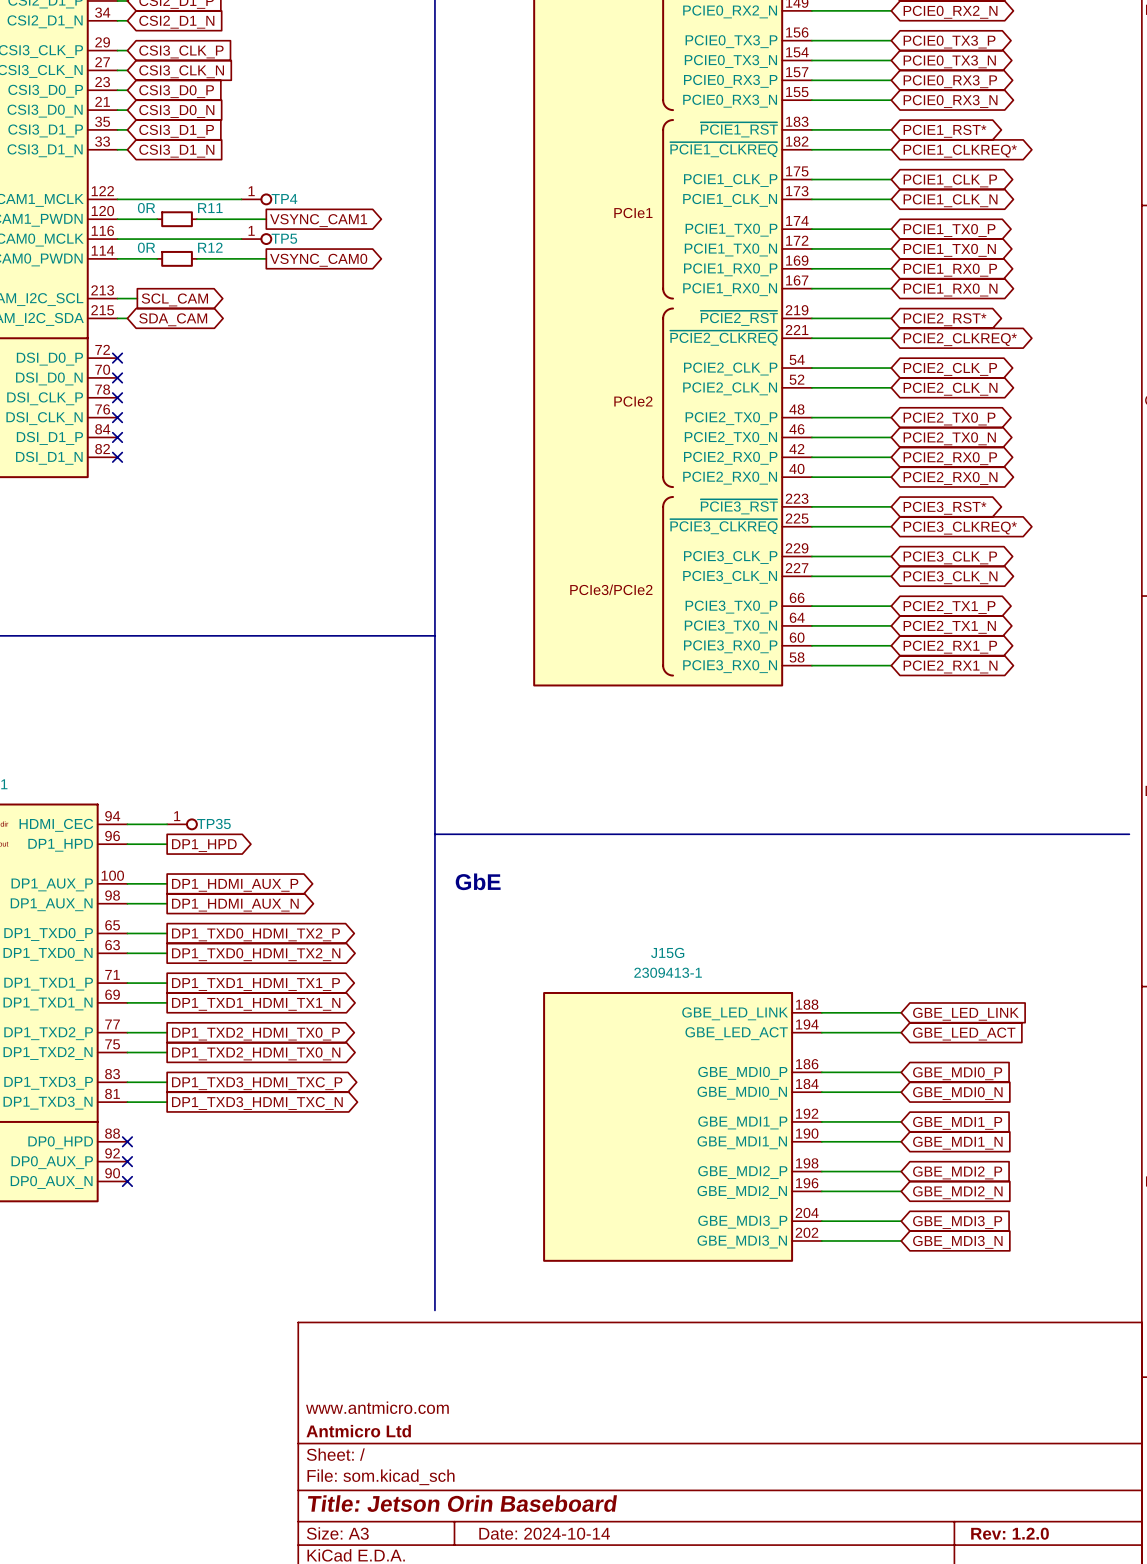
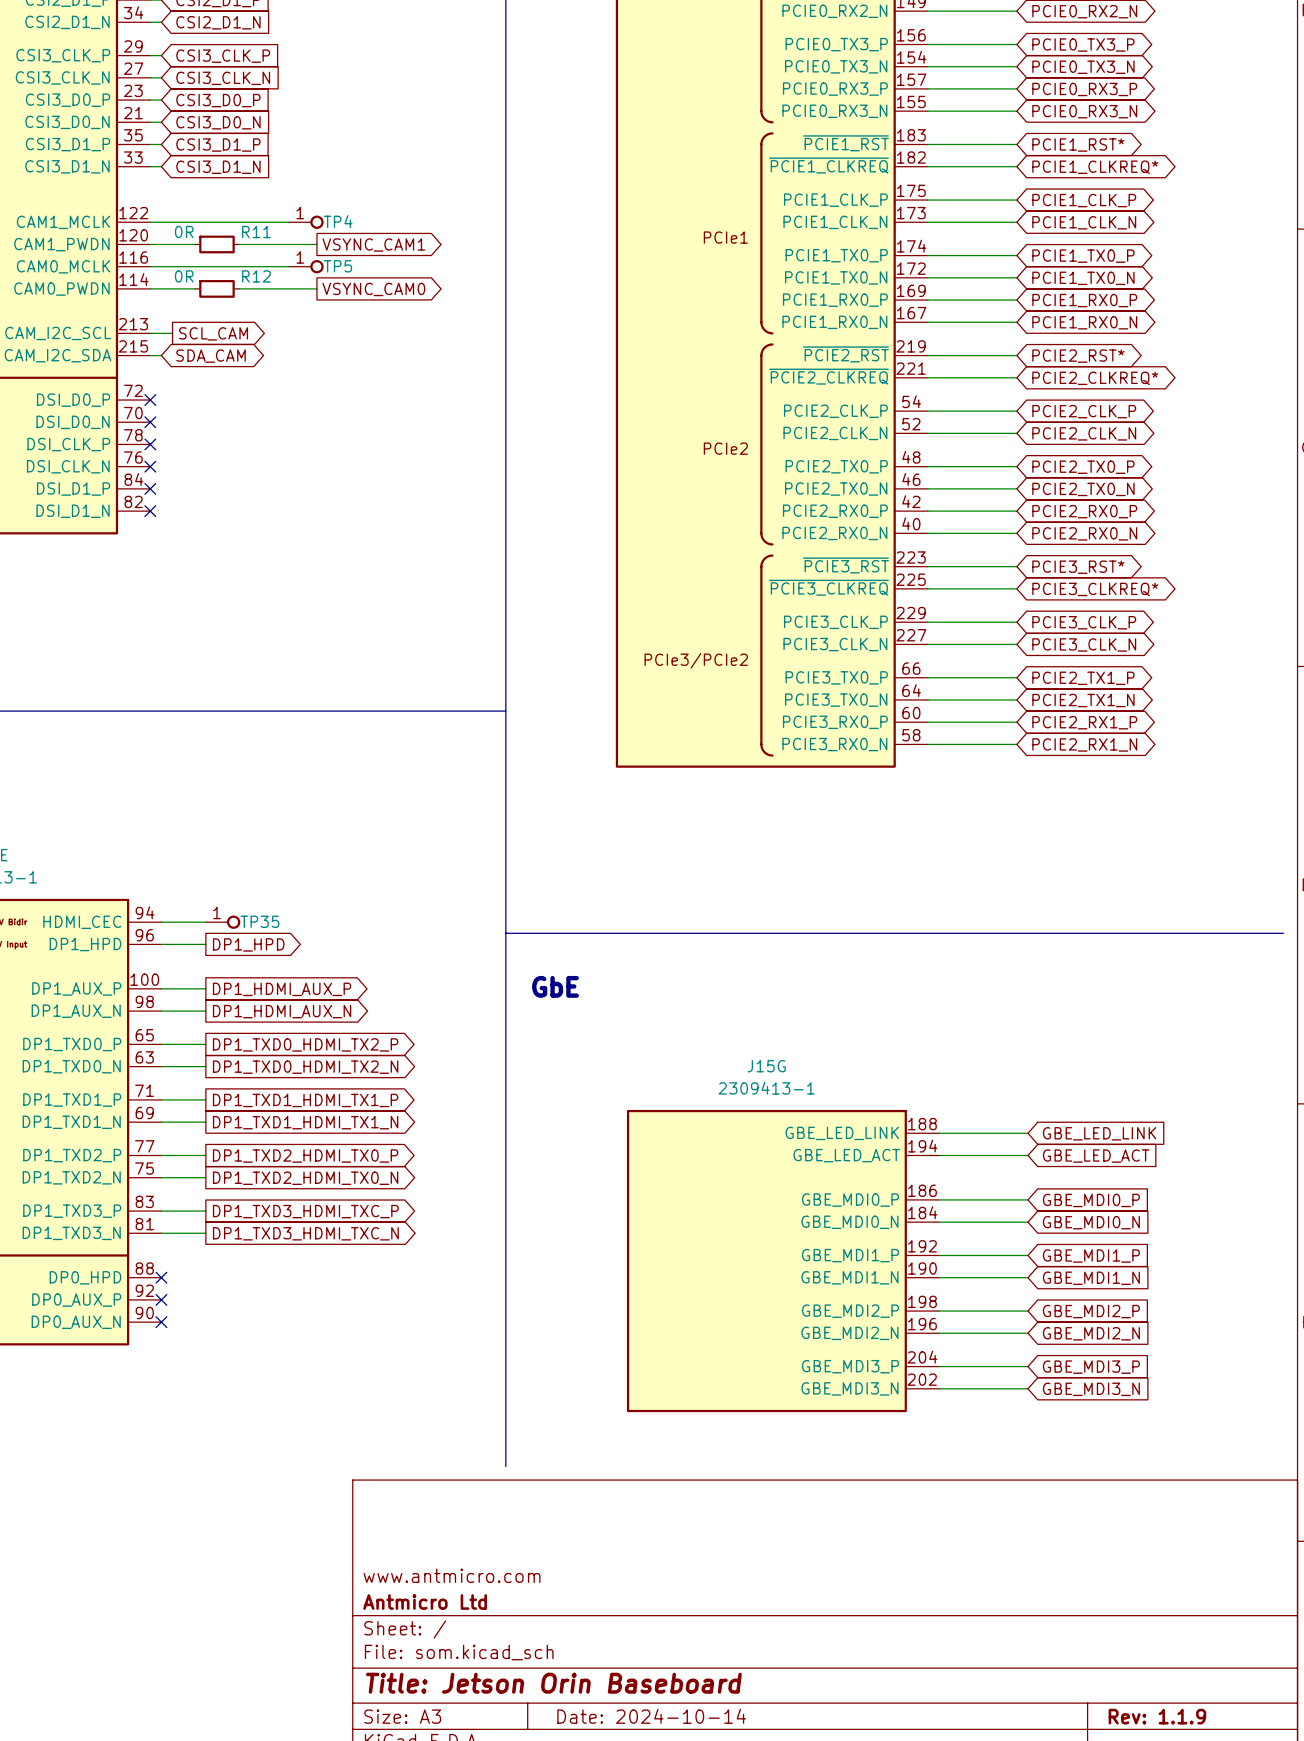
title block: Rev: 1.2.0 (1010, 1533) -> Rev: 1.1.9 (1157, 1716)

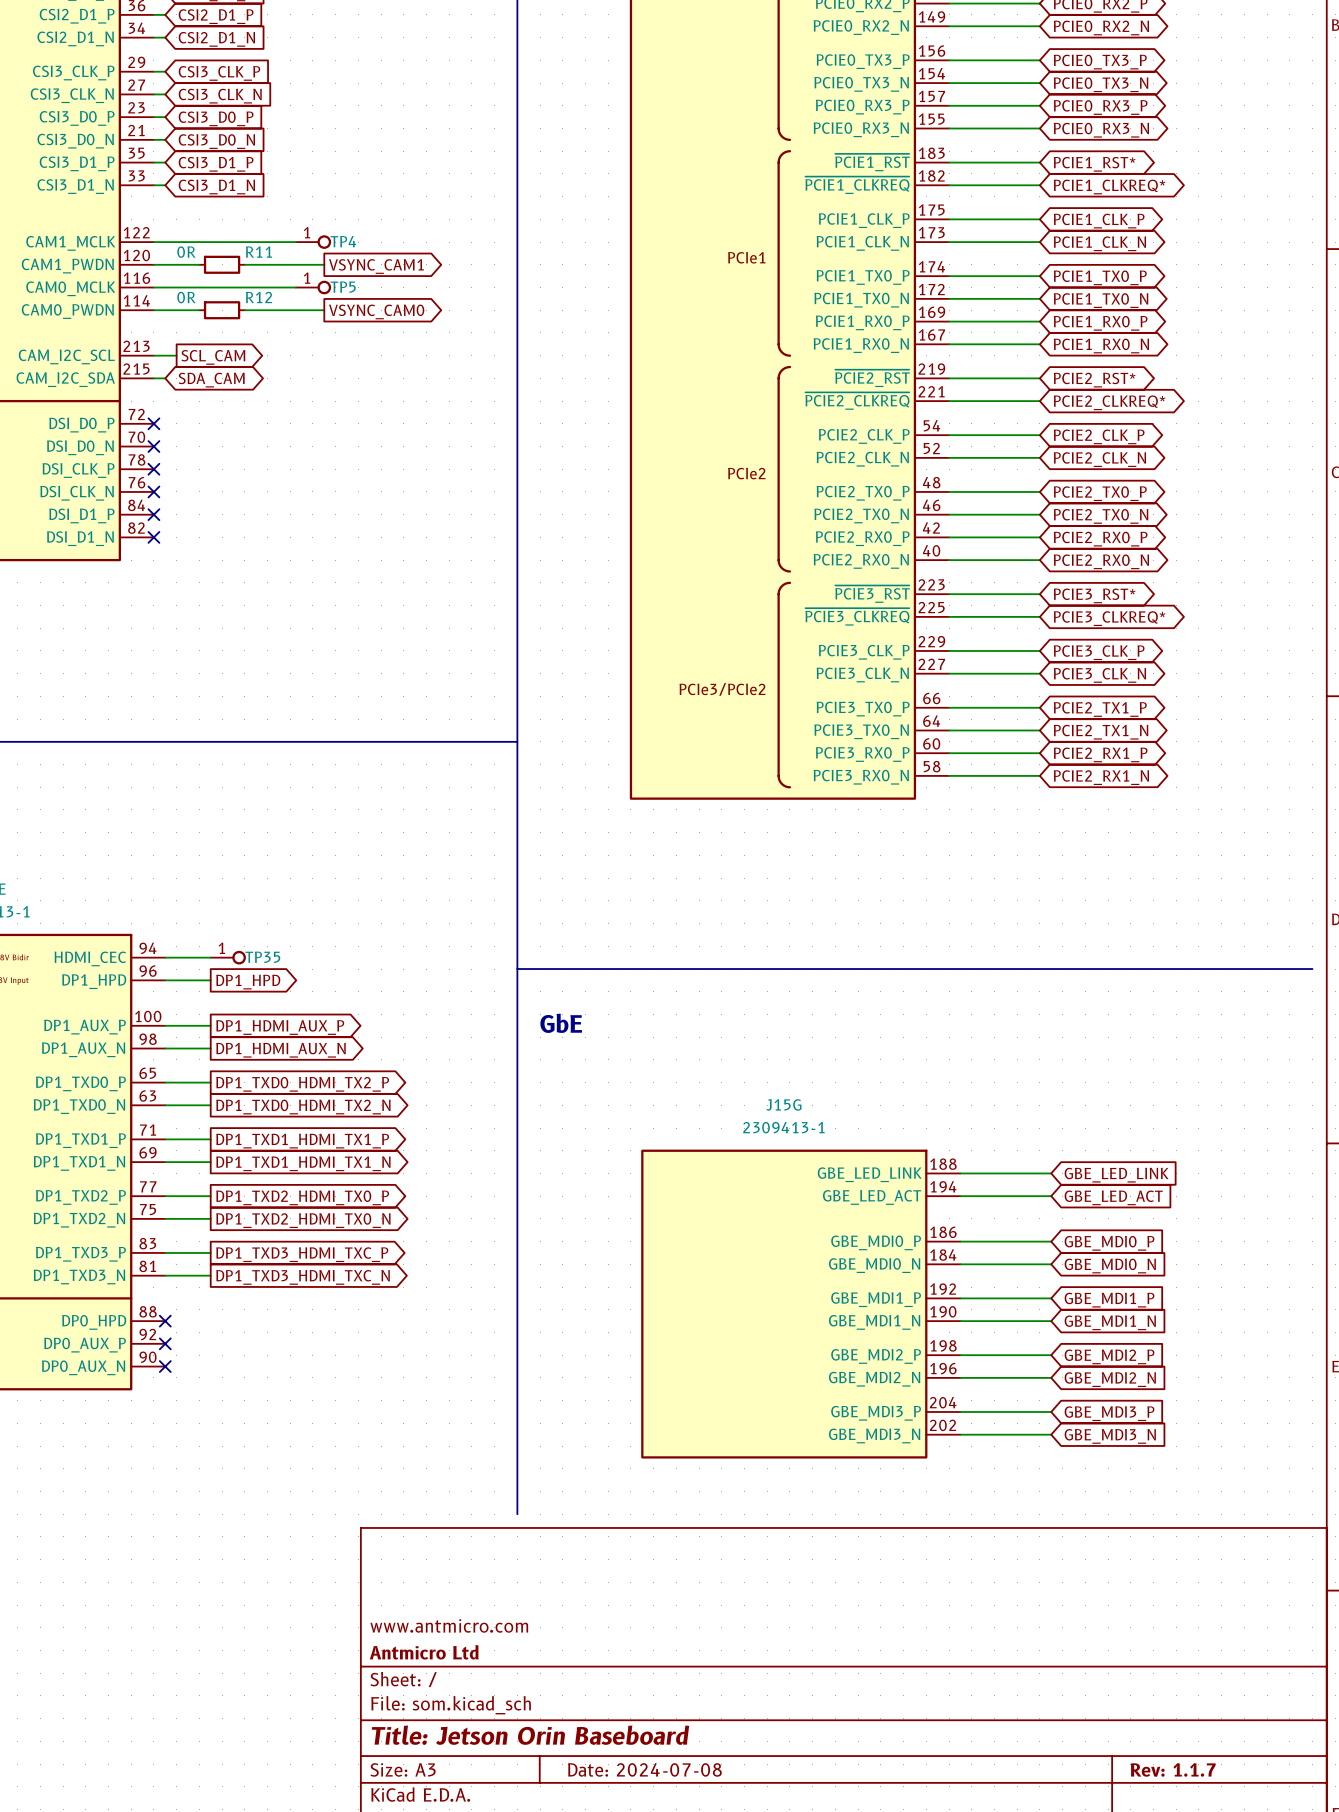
title block: Date: 2024-10-14 (651, 1716) -> Date: 2024-07-08 (644, 1769)
title block: Rev: 1.1.9 (1157, 1716) -> Rev: 1.1.7 (1173, 1769)

